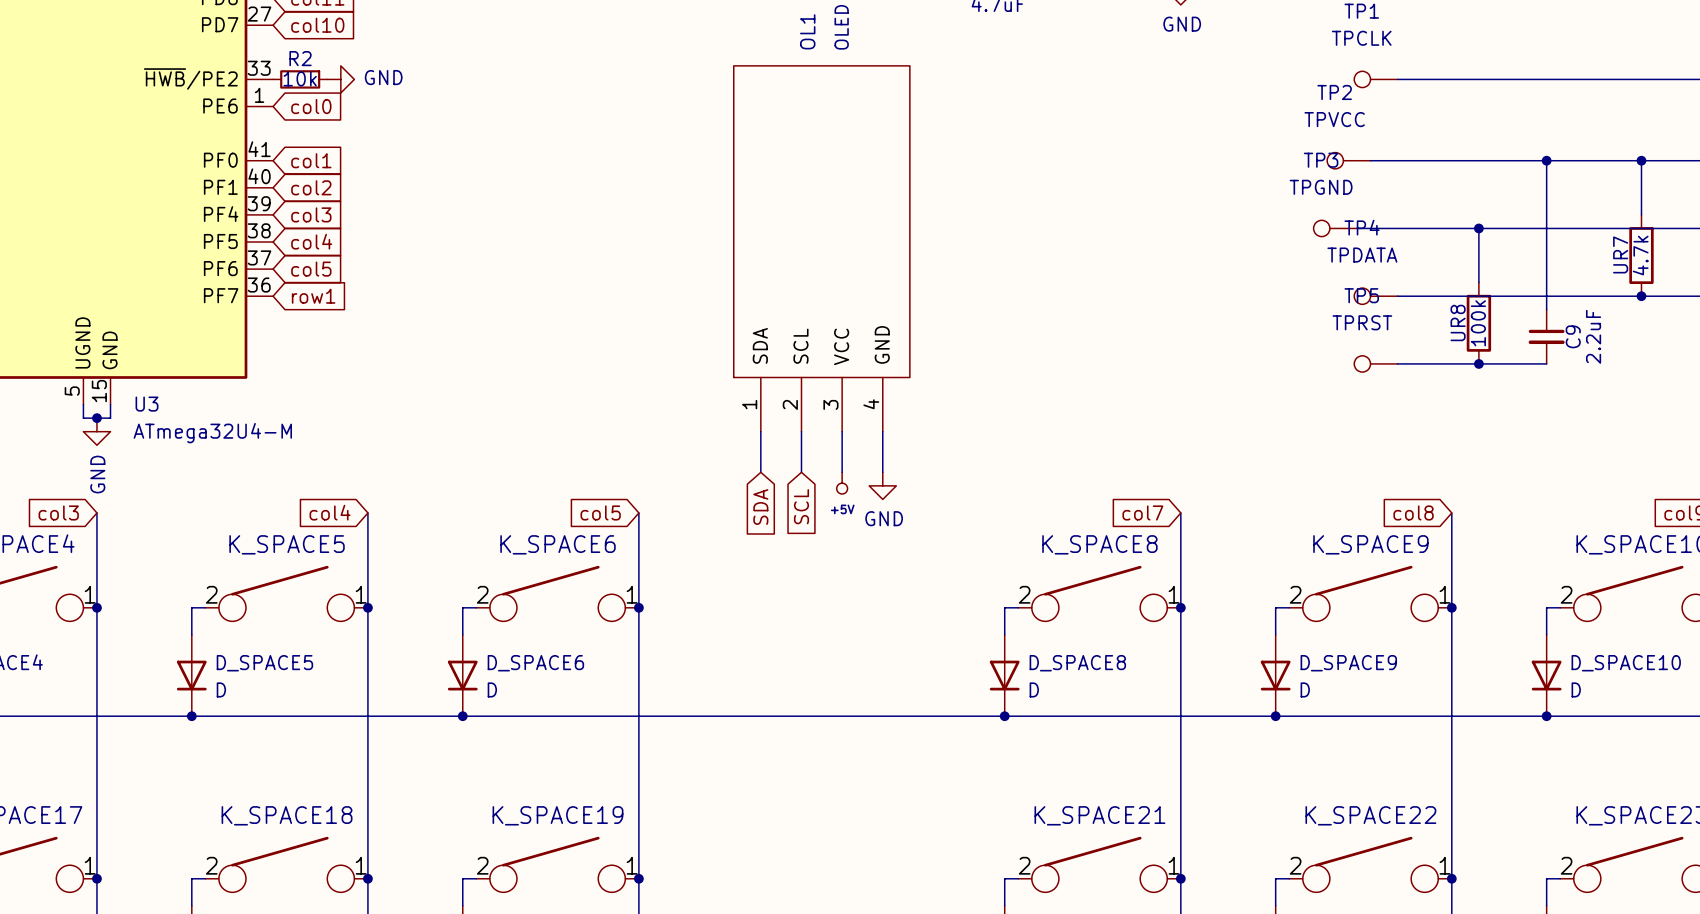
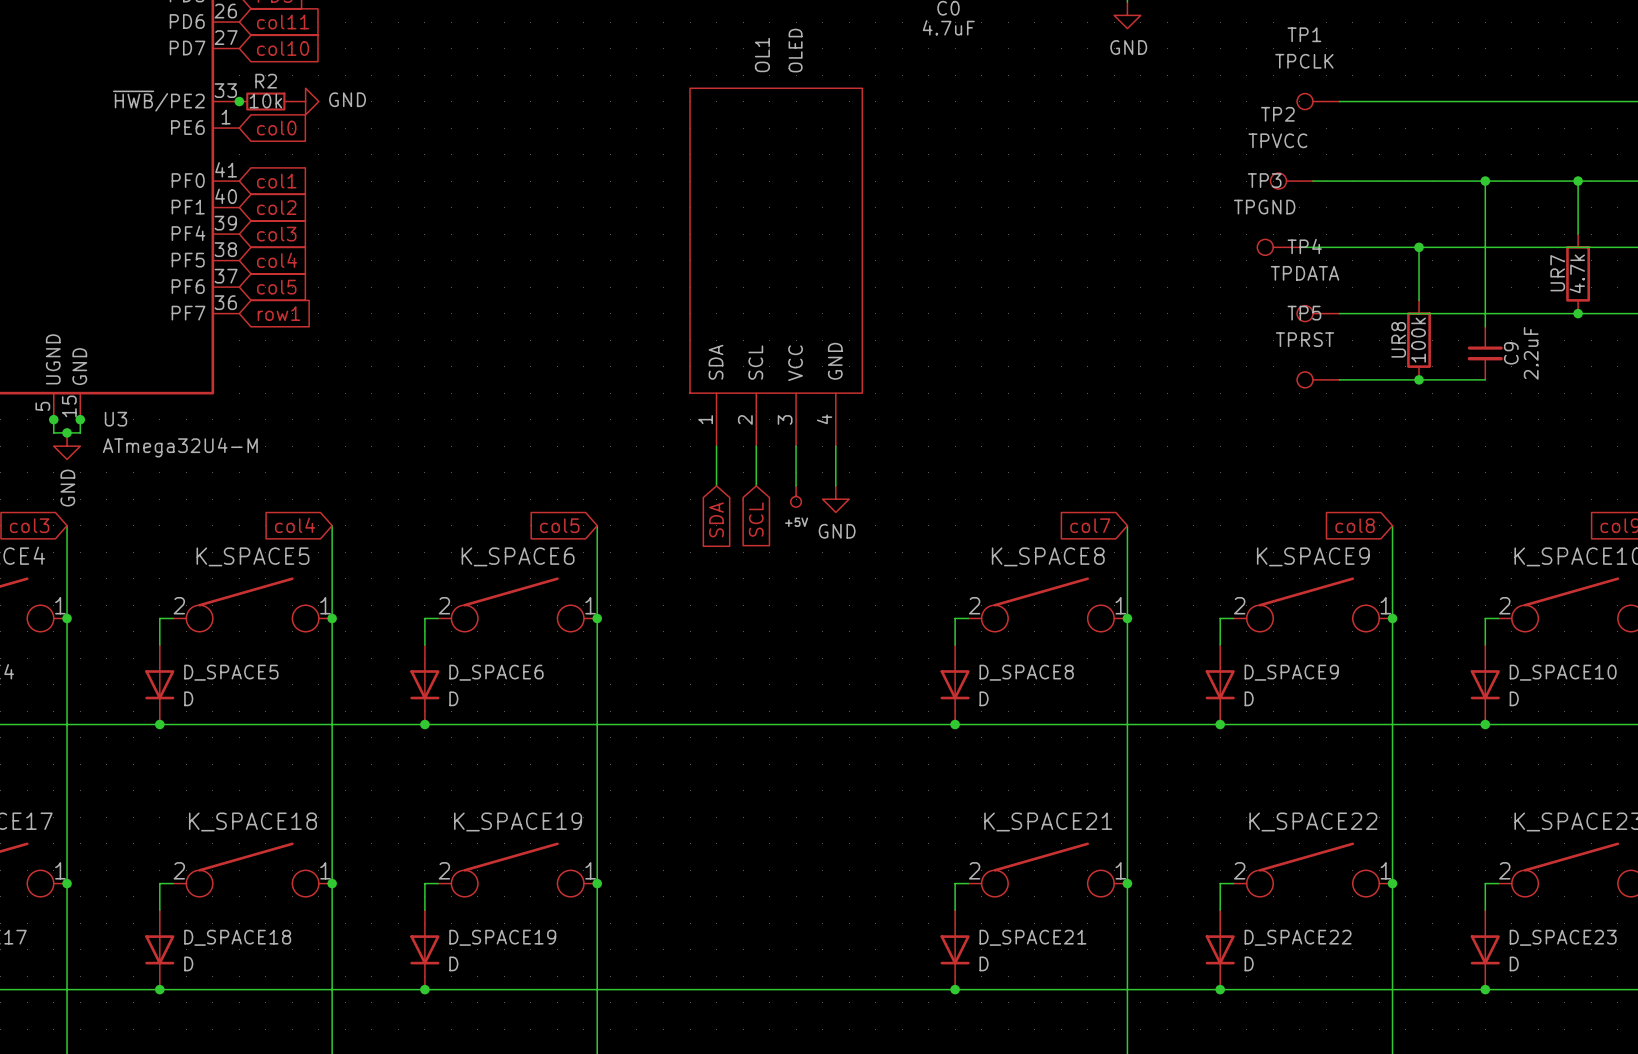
junction: none -> (239, 101)
junction: none -> (53, 419)
junction: none -> (80, 419)

